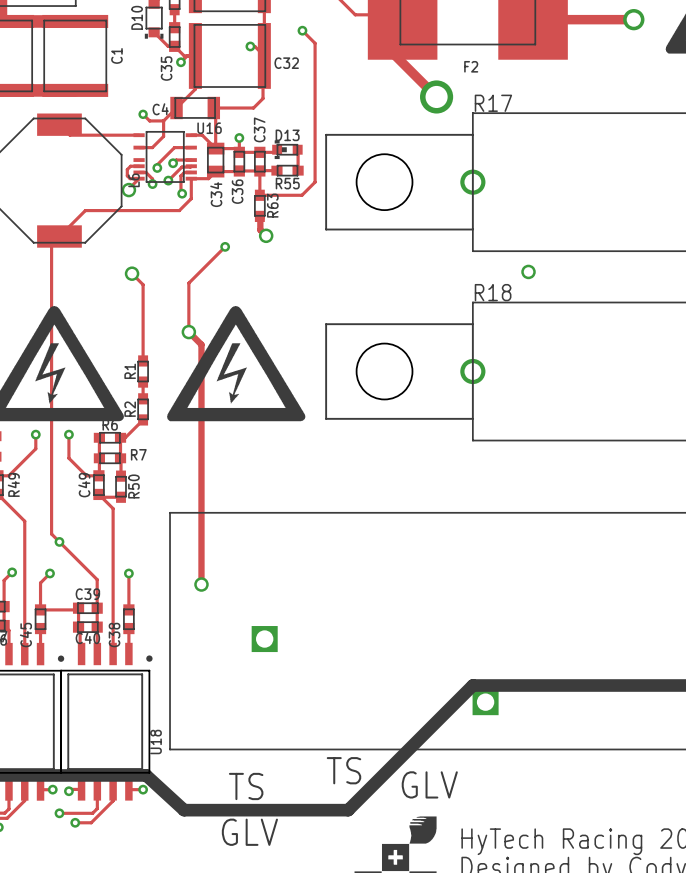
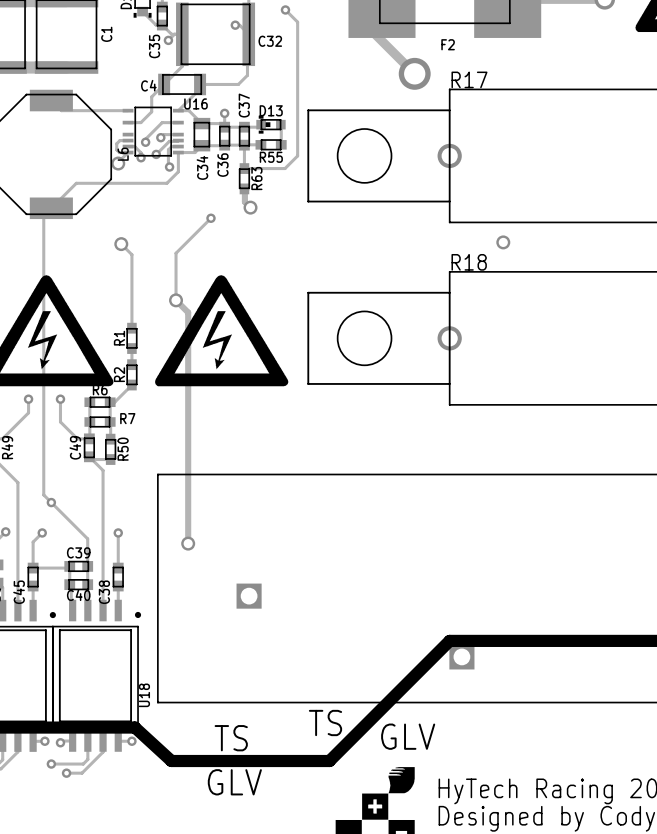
track: (213, 108) (215, 109) (215, 148) -> none
track: none -> (200, 88) (178, 110)
track: (143, 114) (149, 120) (163, 120) -> none
via: (143, 114) -> none

